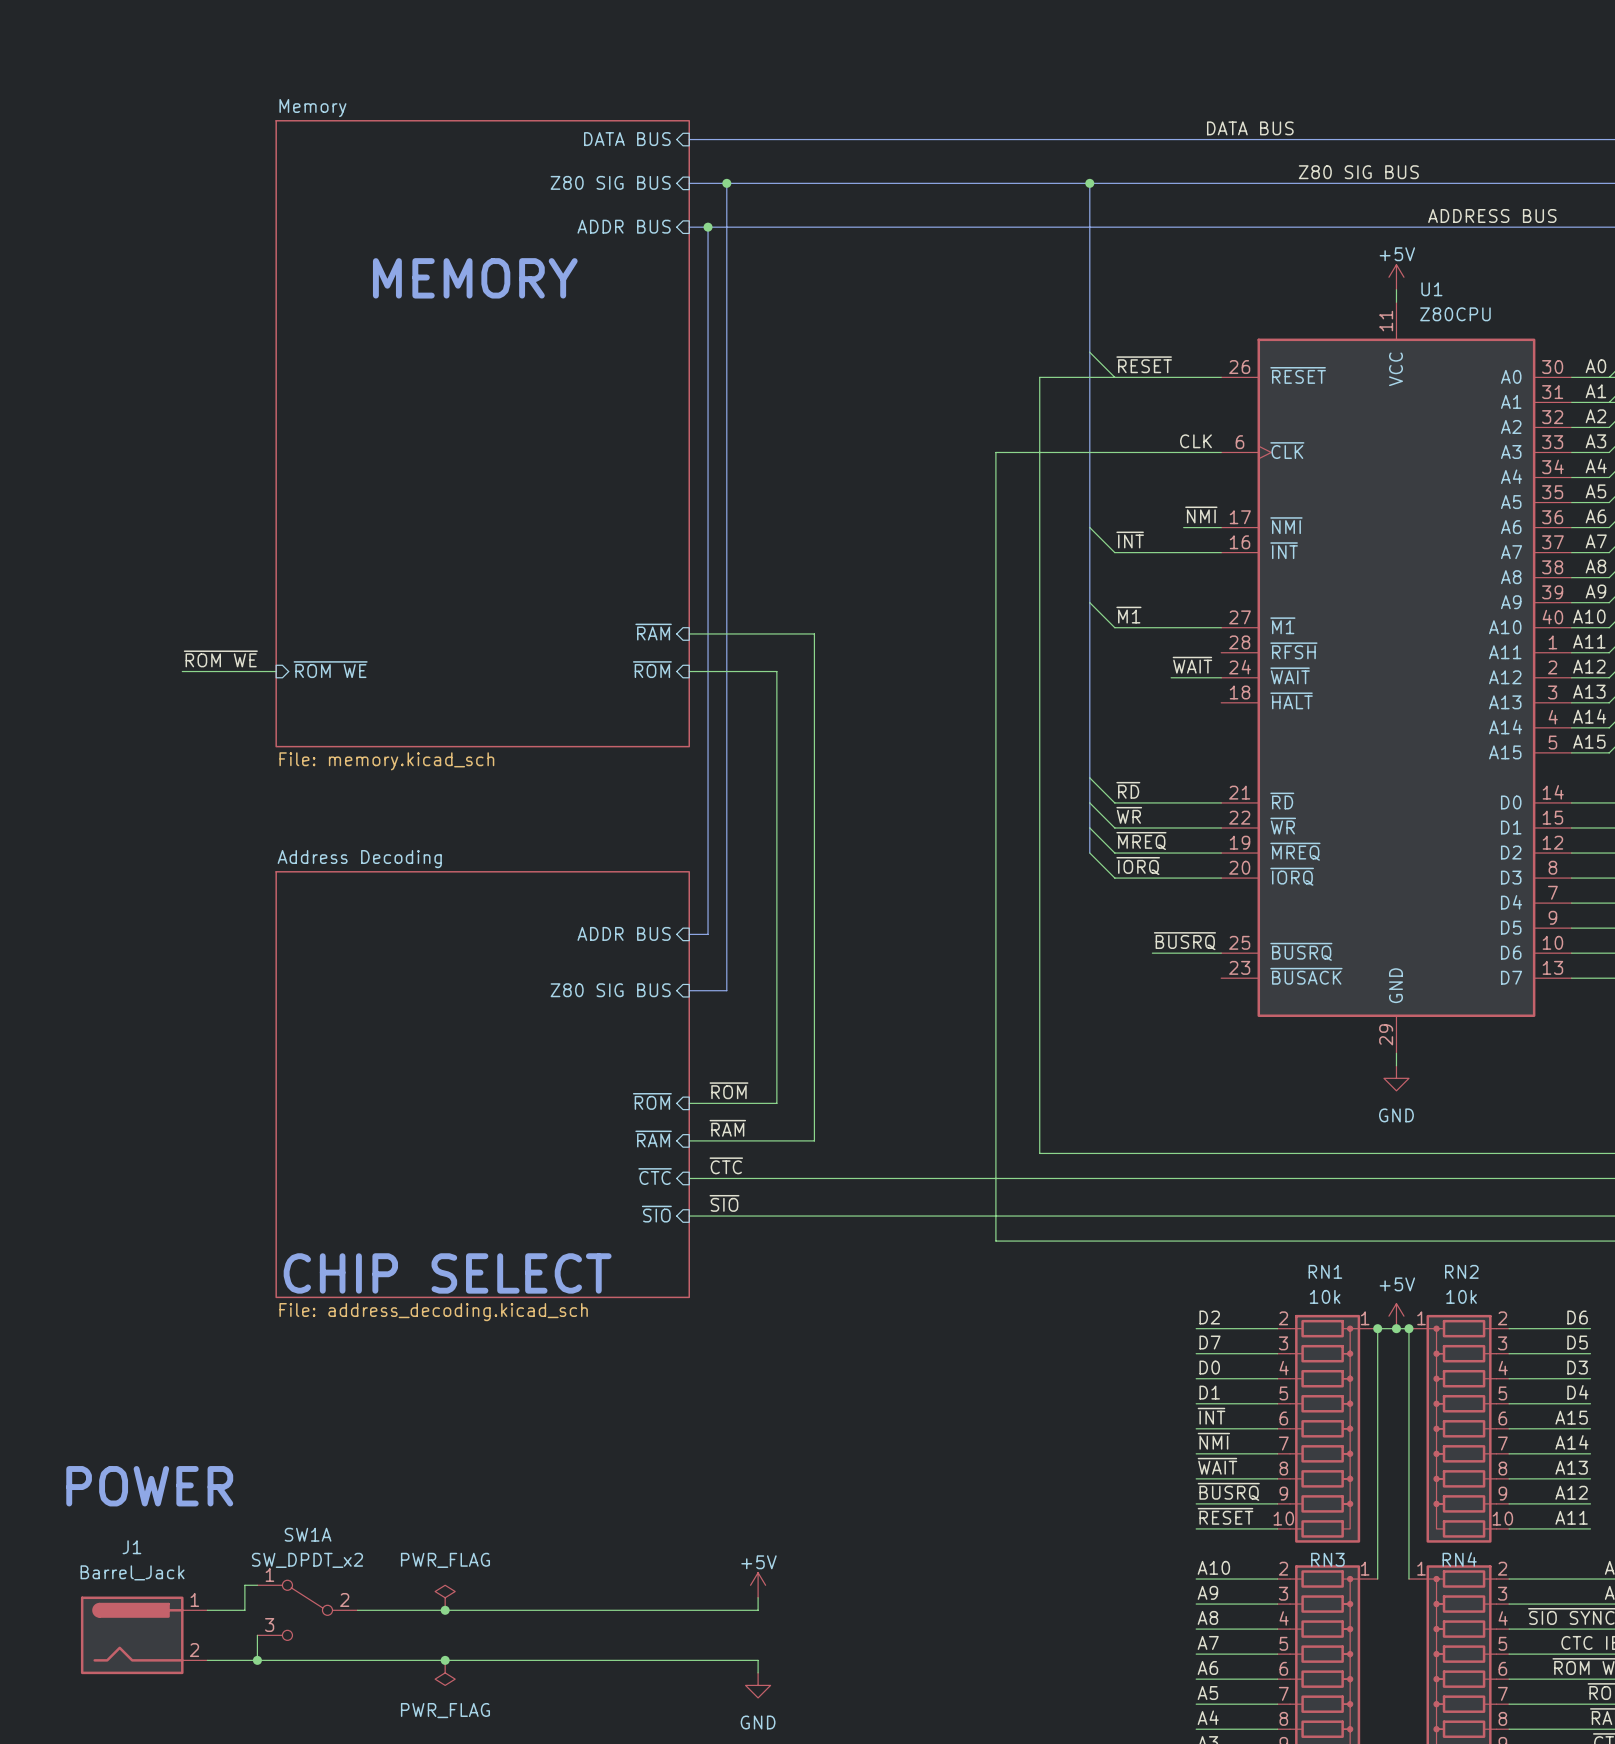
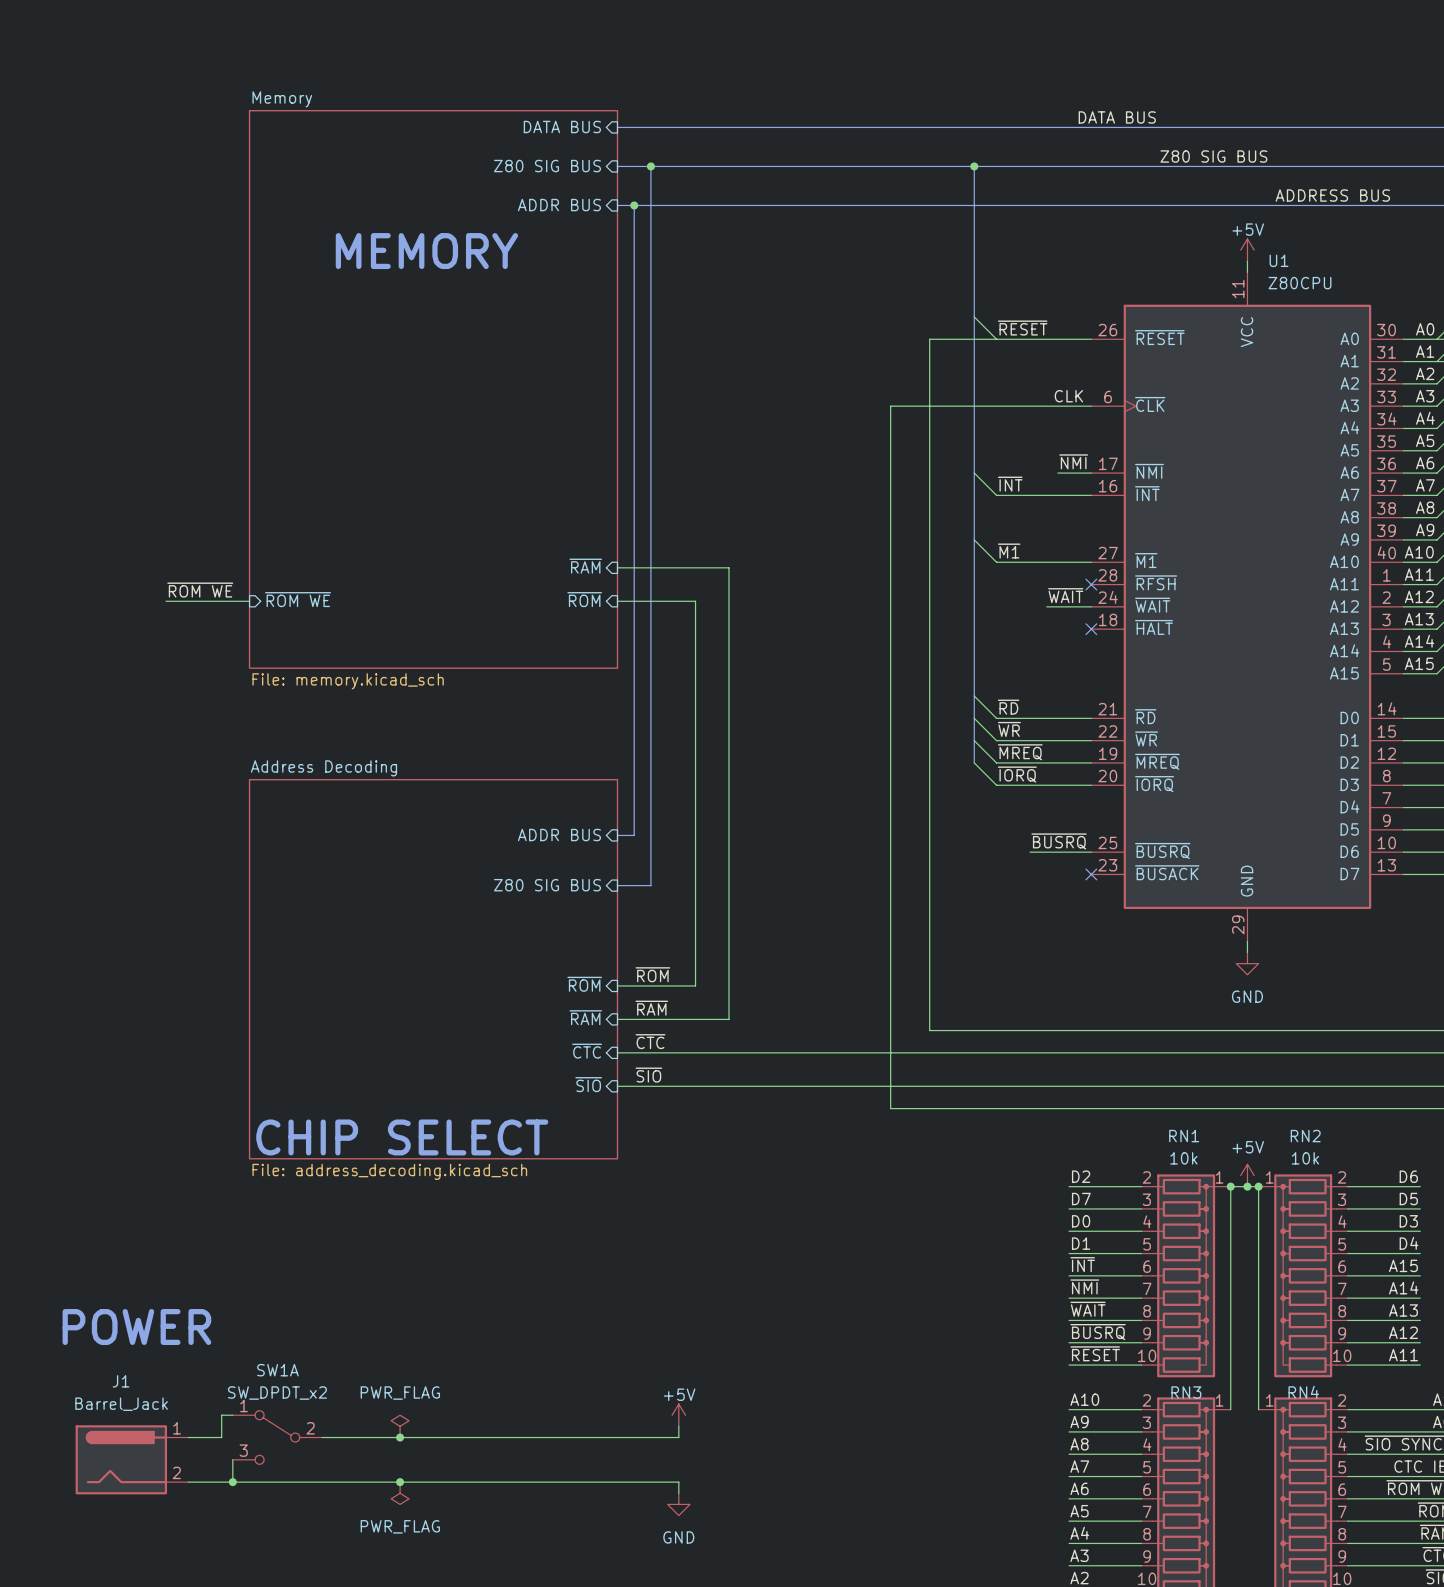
no-connect mark: none -> (1091, 584)
no-connect mark: none -> (1091, 629)
no-connect mark: none -> (1091, 874)

